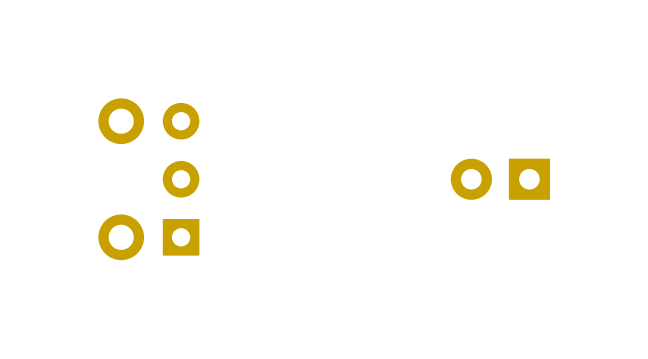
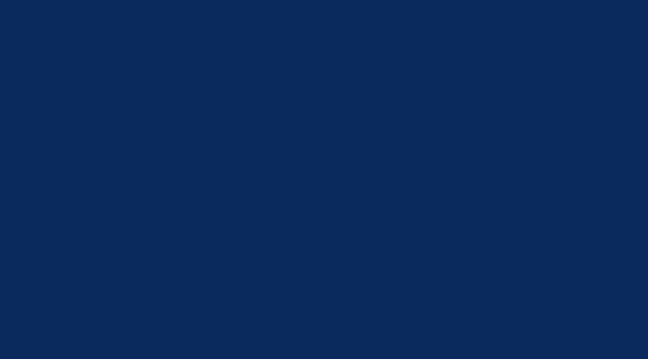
part: (148, 179) -> none
part: (500, 179) -> none

